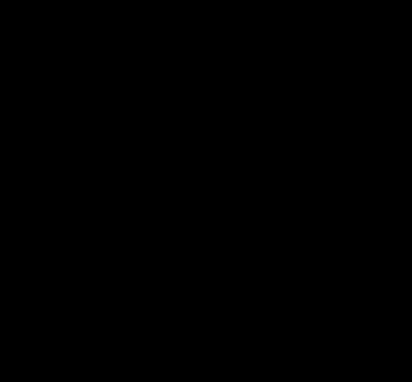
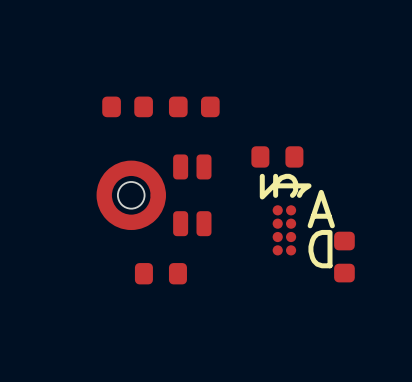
part: none -> (127, 106)
part: none -> (194, 106)
part: none -> (277, 156)
part: none -> (154, 195)
part: none -> (284, 230)
part: none -> (344, 257)
part: none -> (160, 273)

